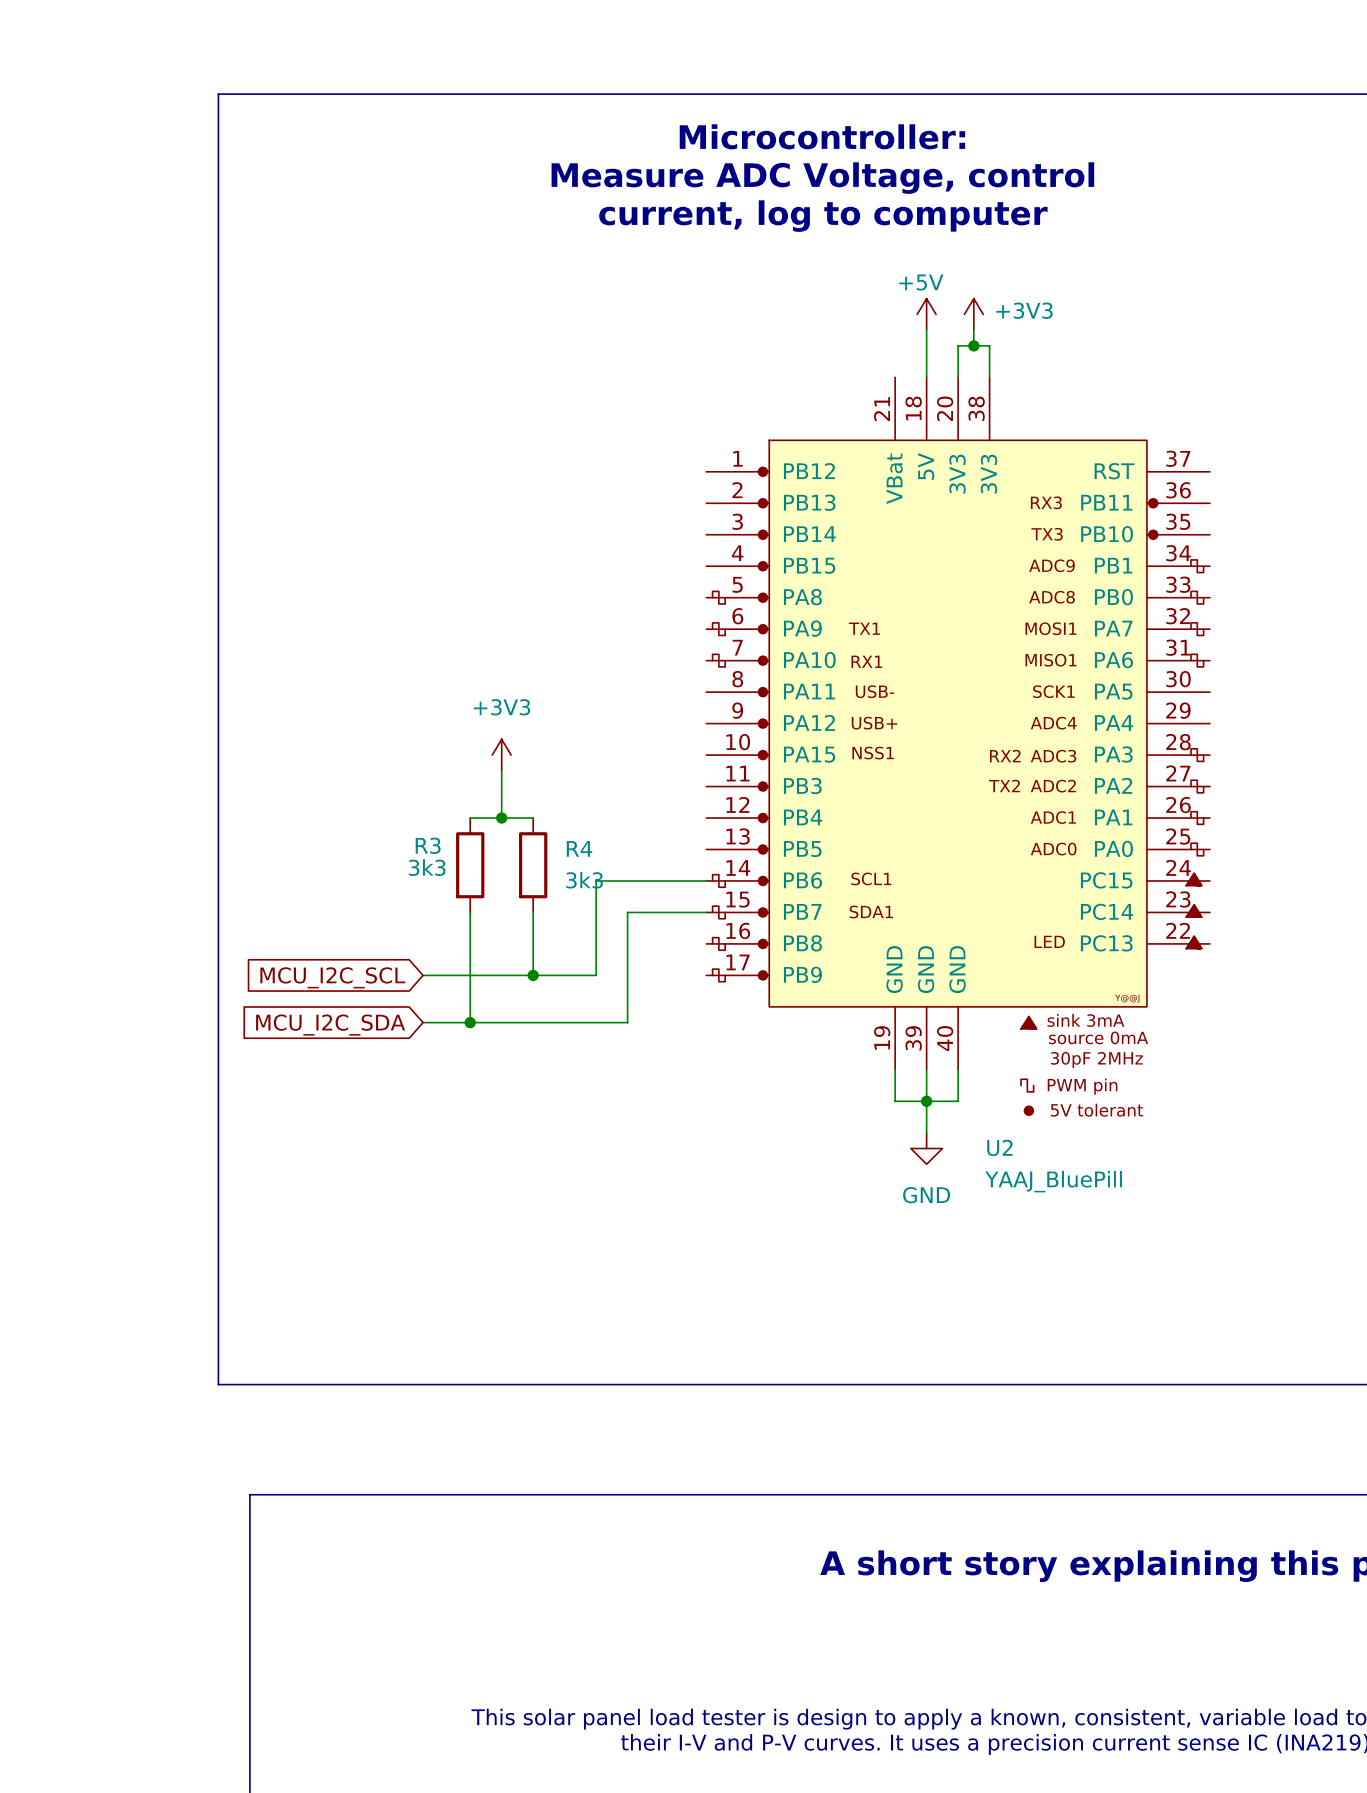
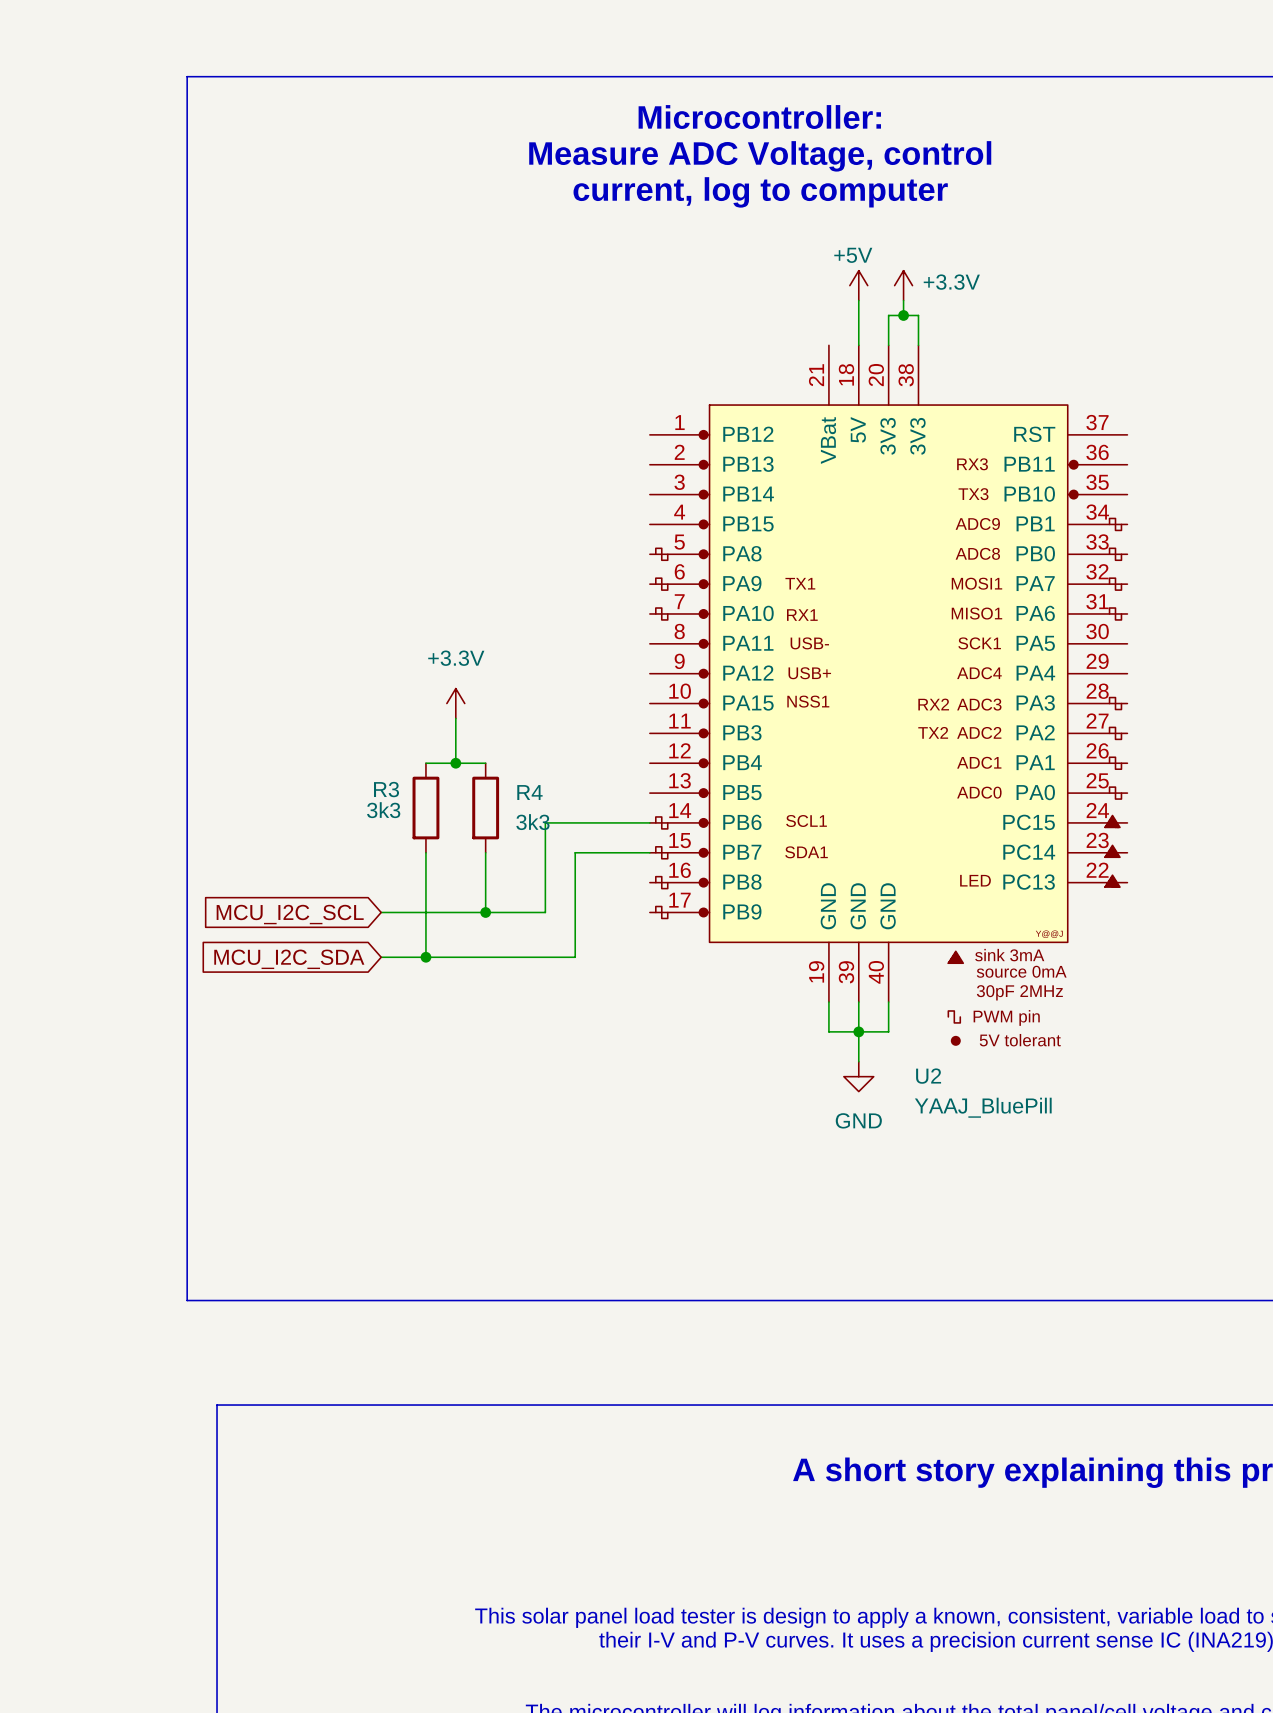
power symbol: +3V3 (973, 314) -> +3.3V (903, 285)
power symbol: +3V3 (501, 755) -> +3.3V (455, 703)

